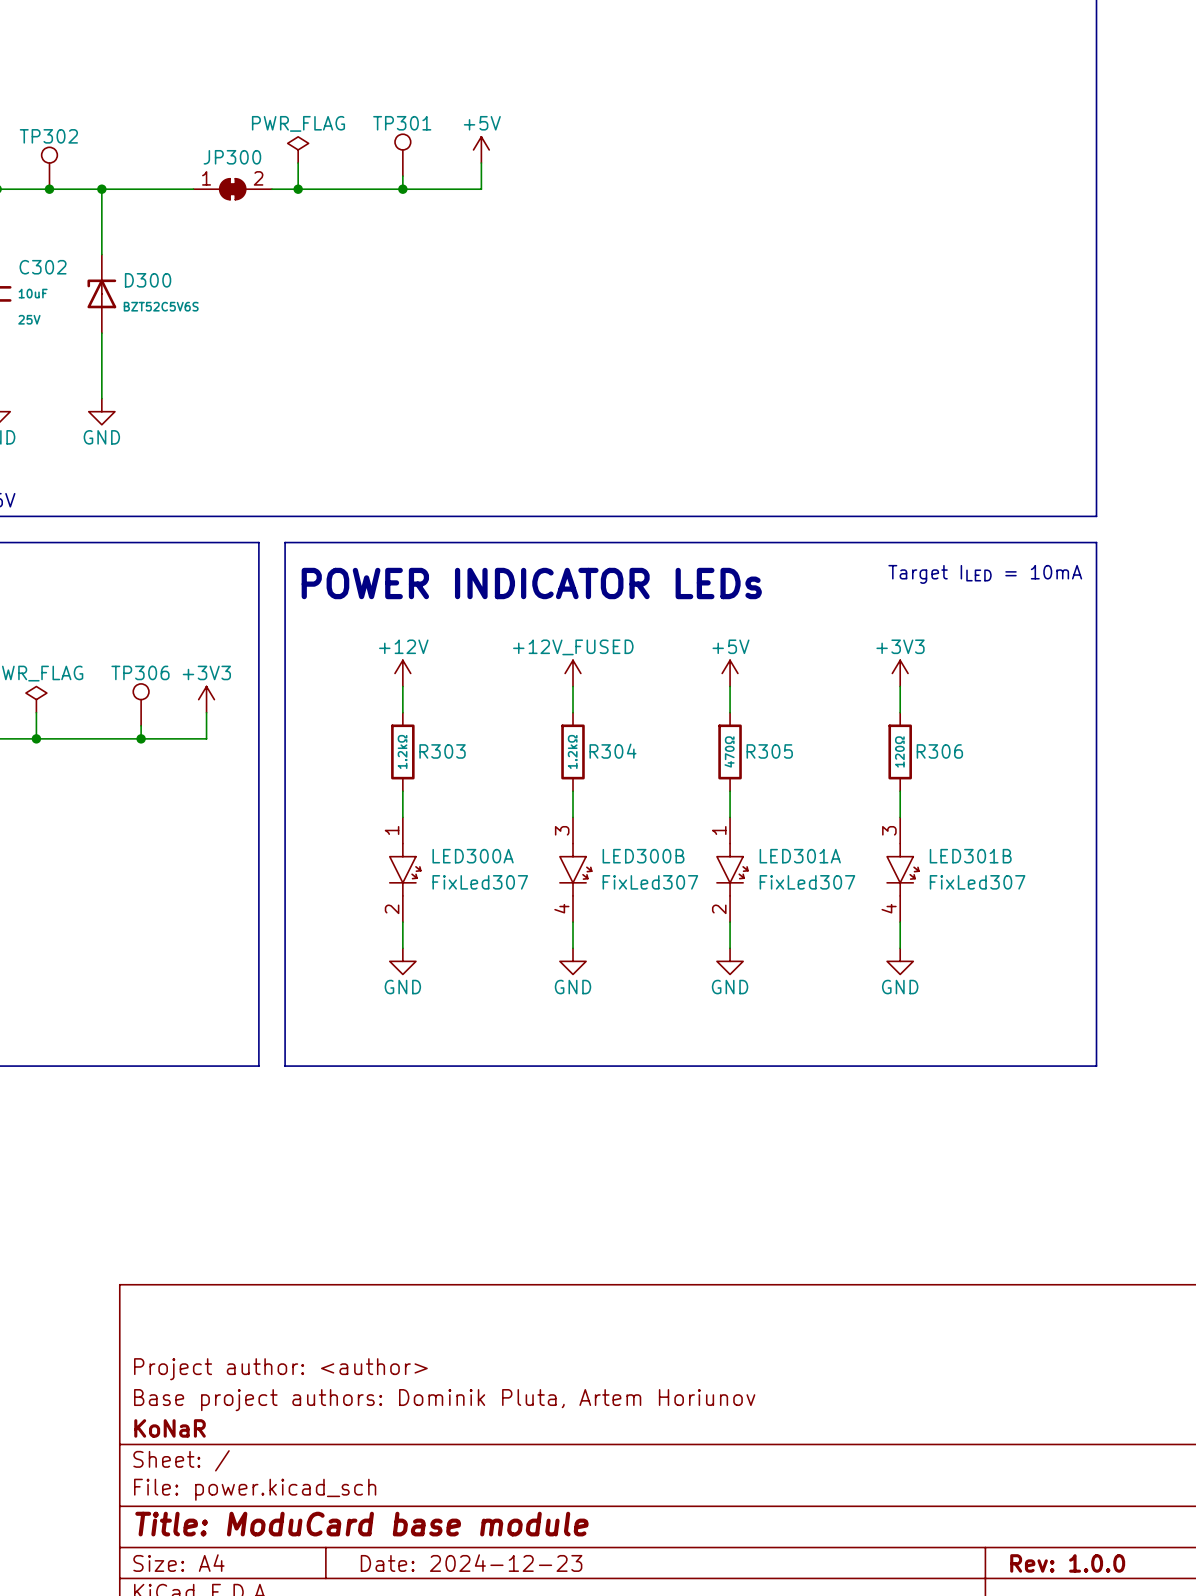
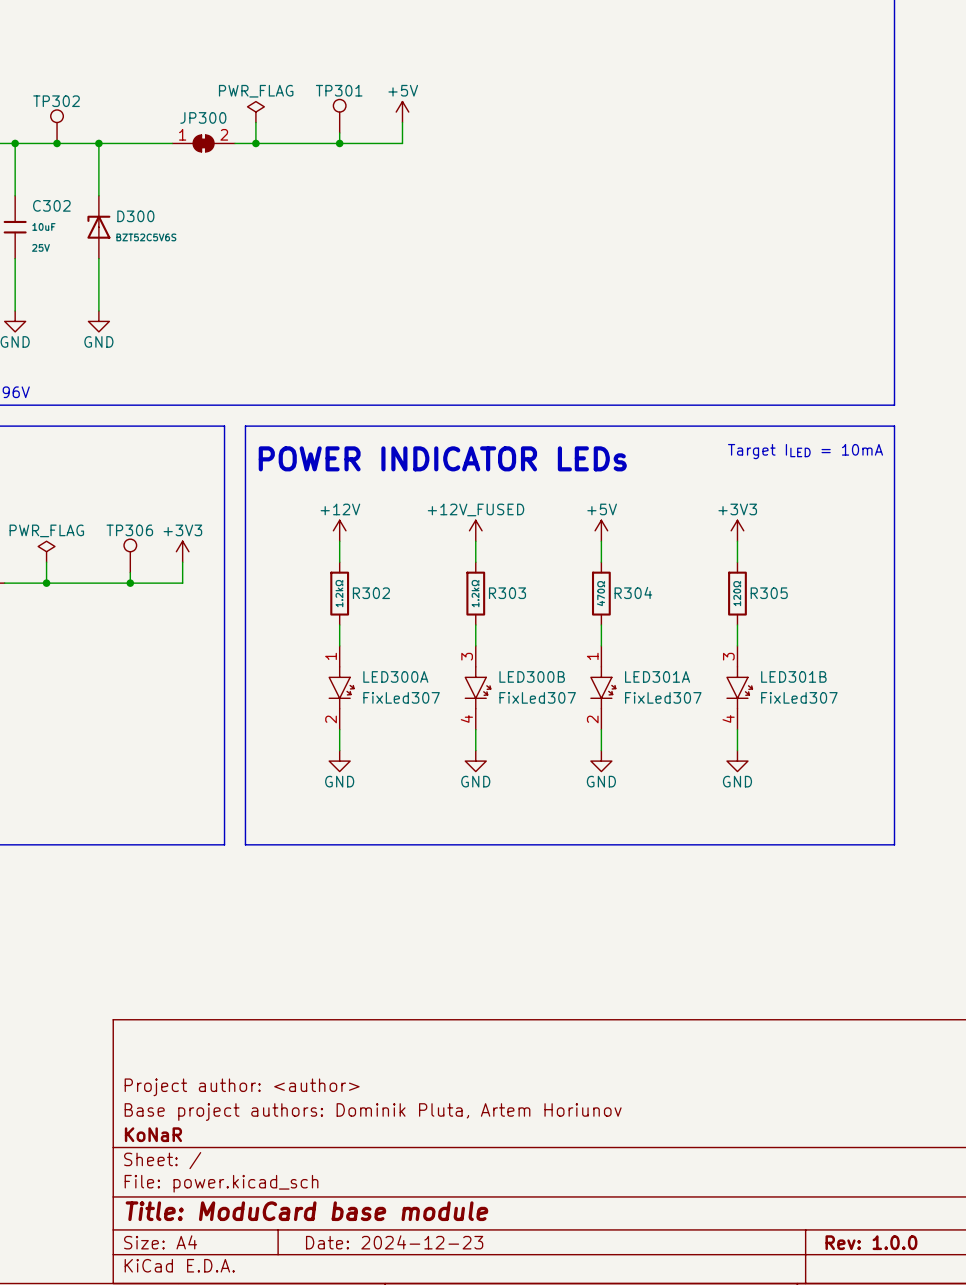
R303 name: R303 (442, 751) -> R302 (371, 593)
R304 name: R304 (612, 751) -> R303 (507, 593)
R305 name: R305 (769, 751) -> R304 (633, 592)
R306 name: R306 (939, 751) -> R305 (769, 593)

